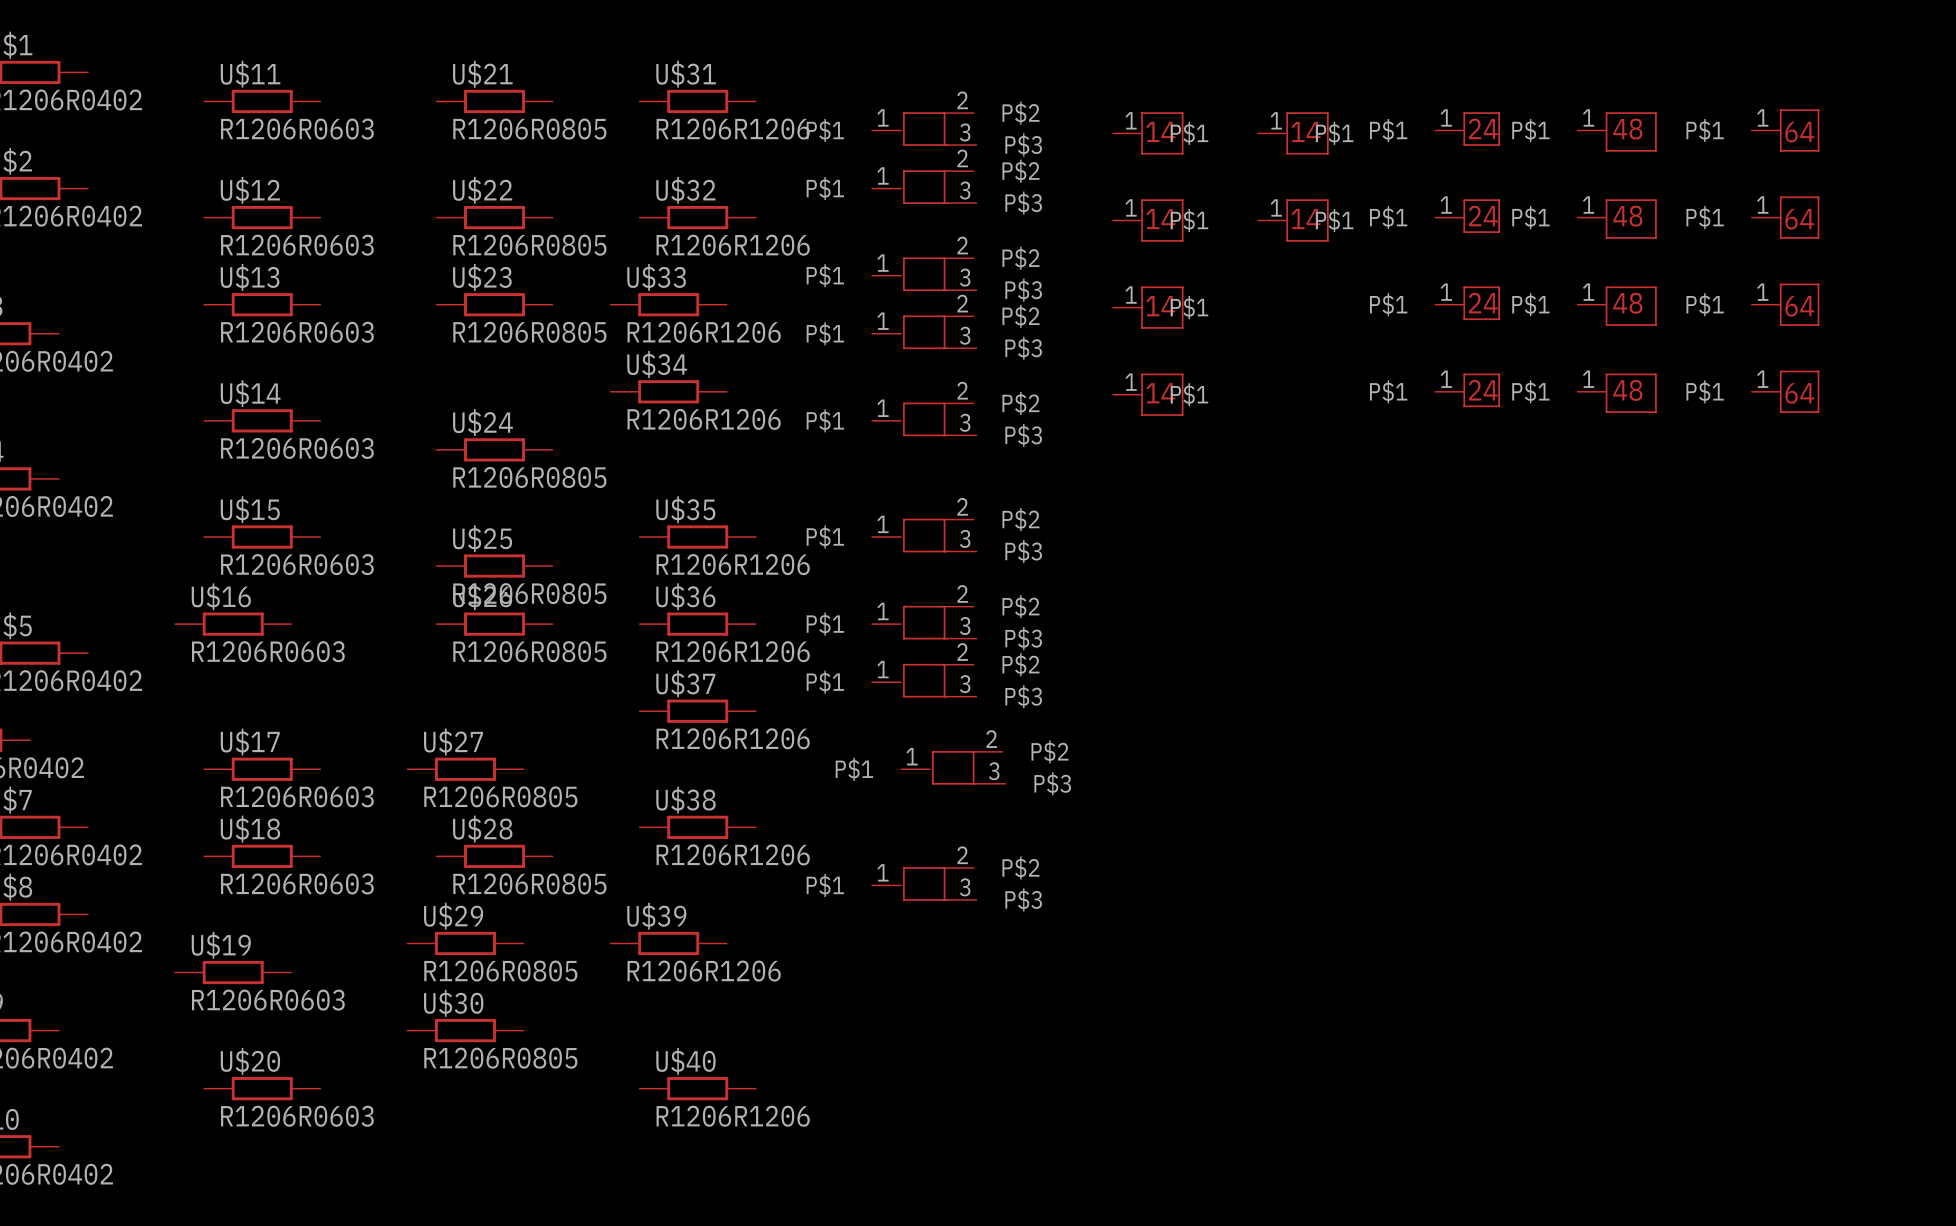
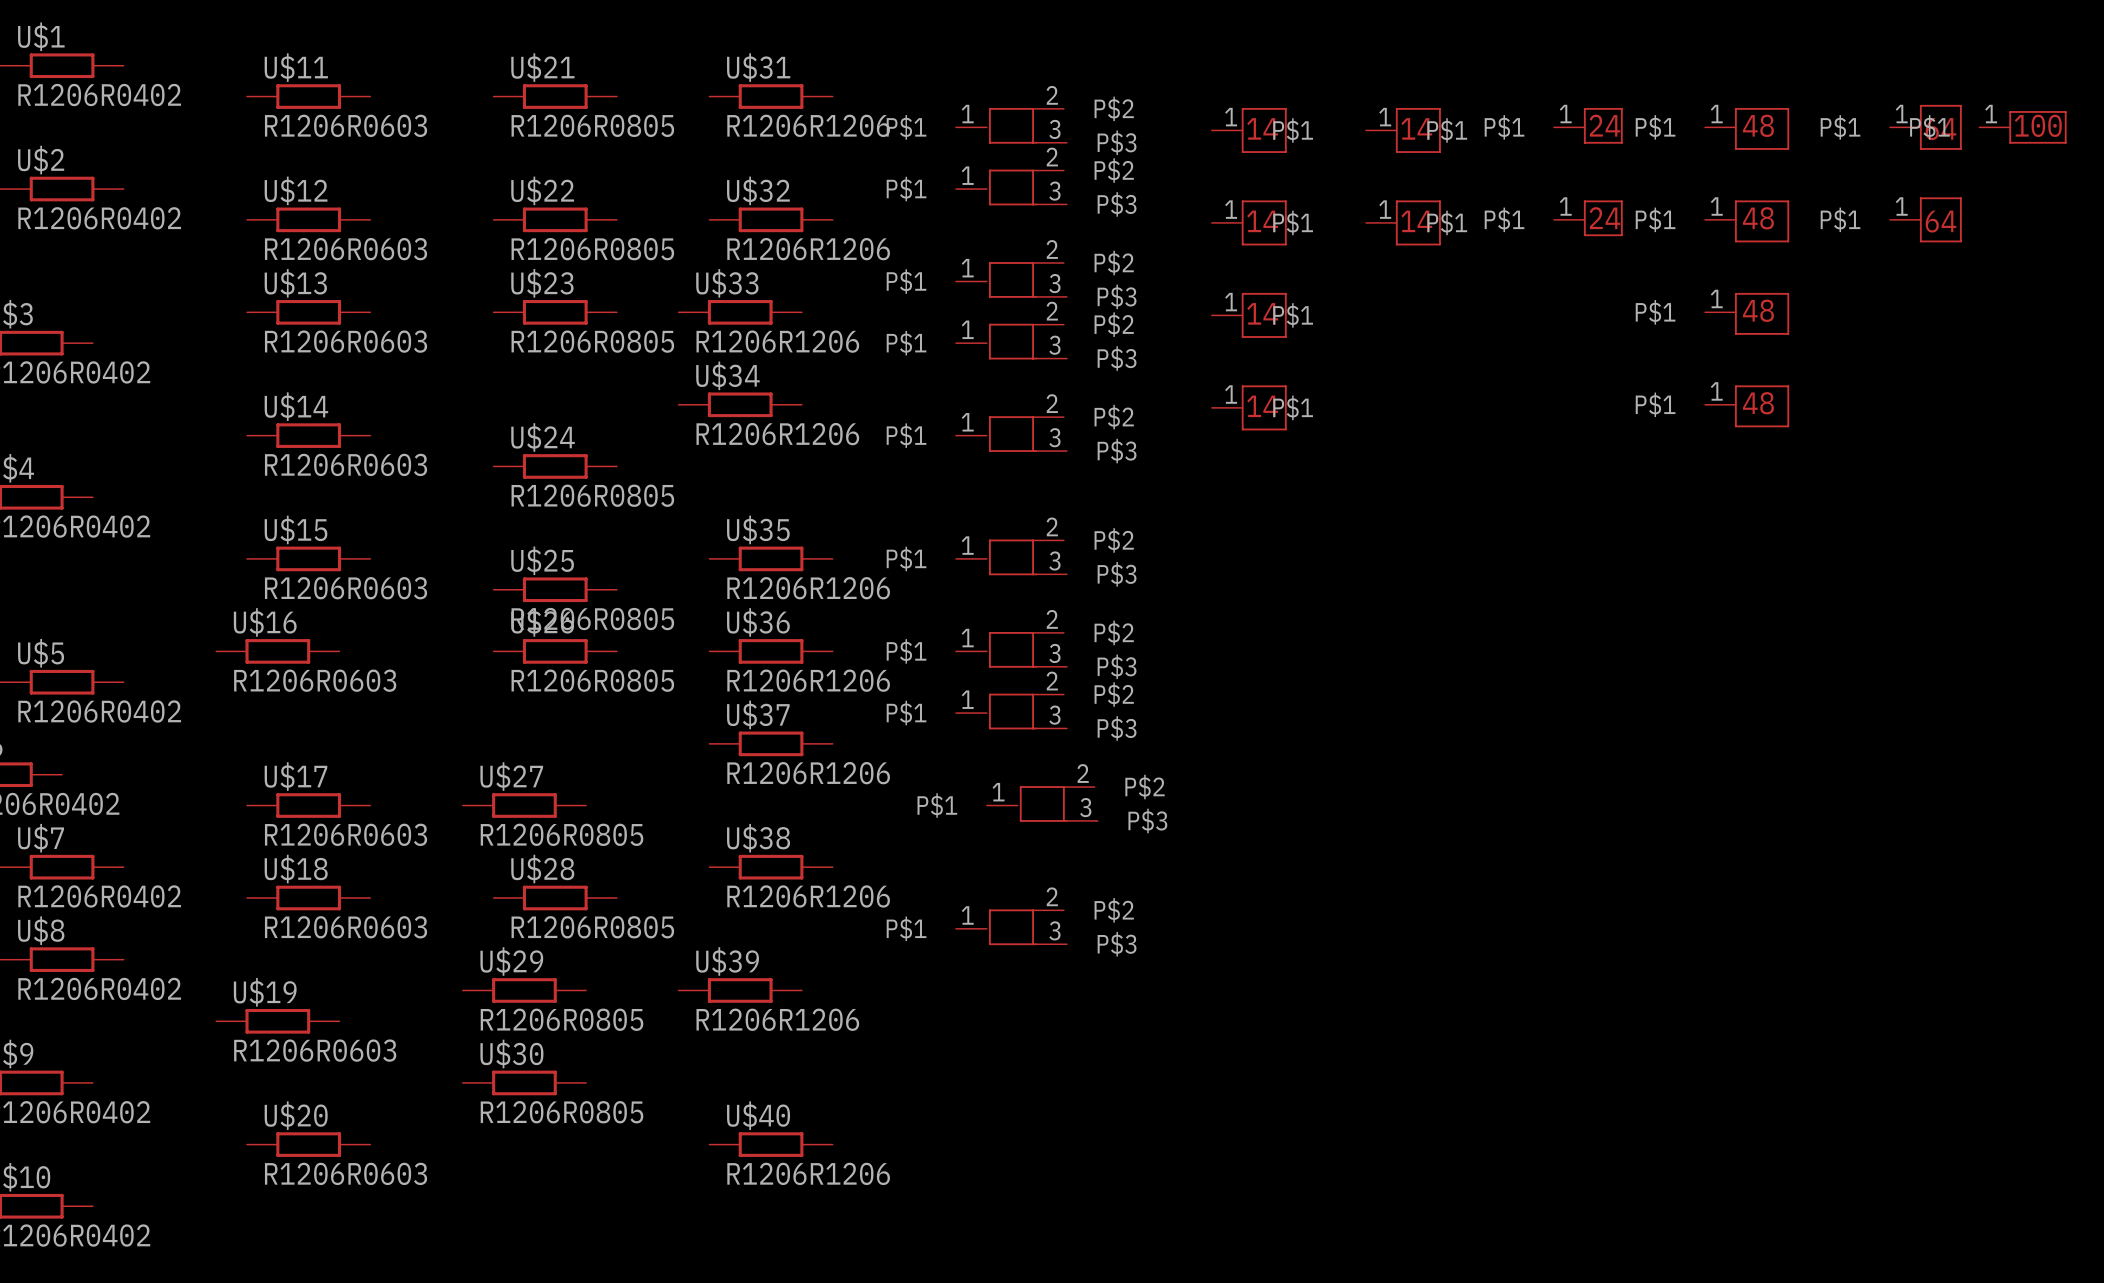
part: none -> (2023, 127)
part: (1467, 303) -> none
part: (1785, 304) -> none
part: (1467, 390) -> none
part: (1785, 391) -> none

